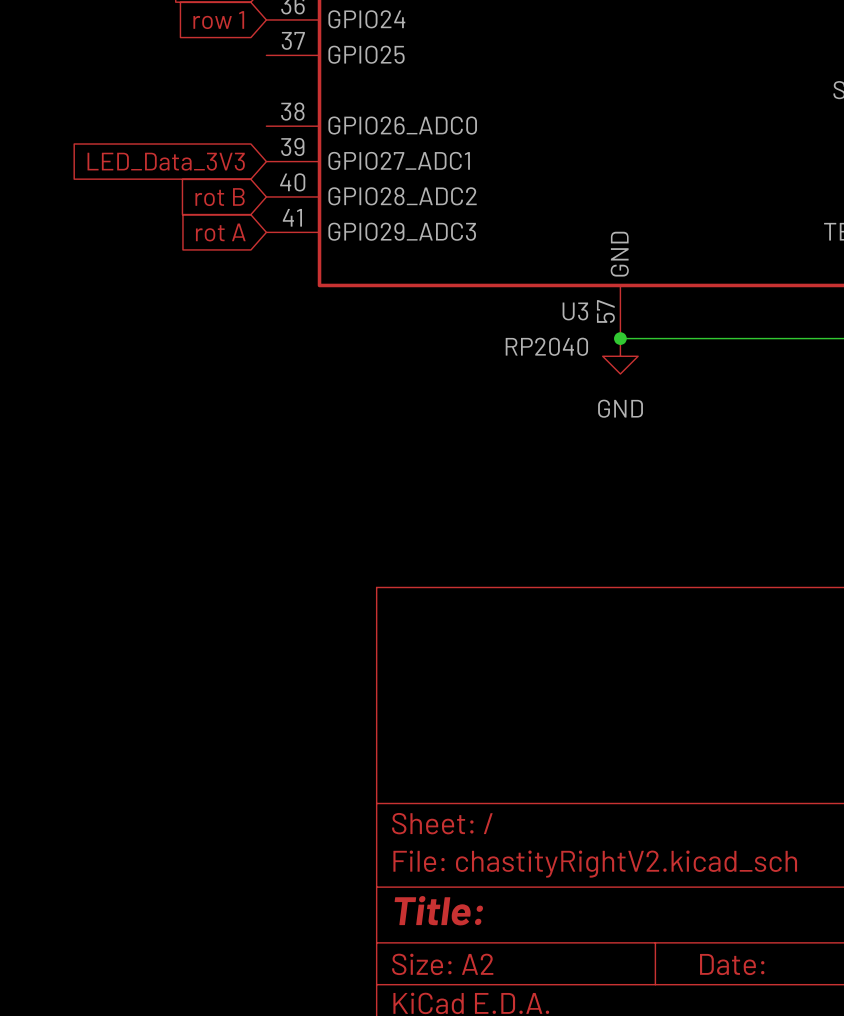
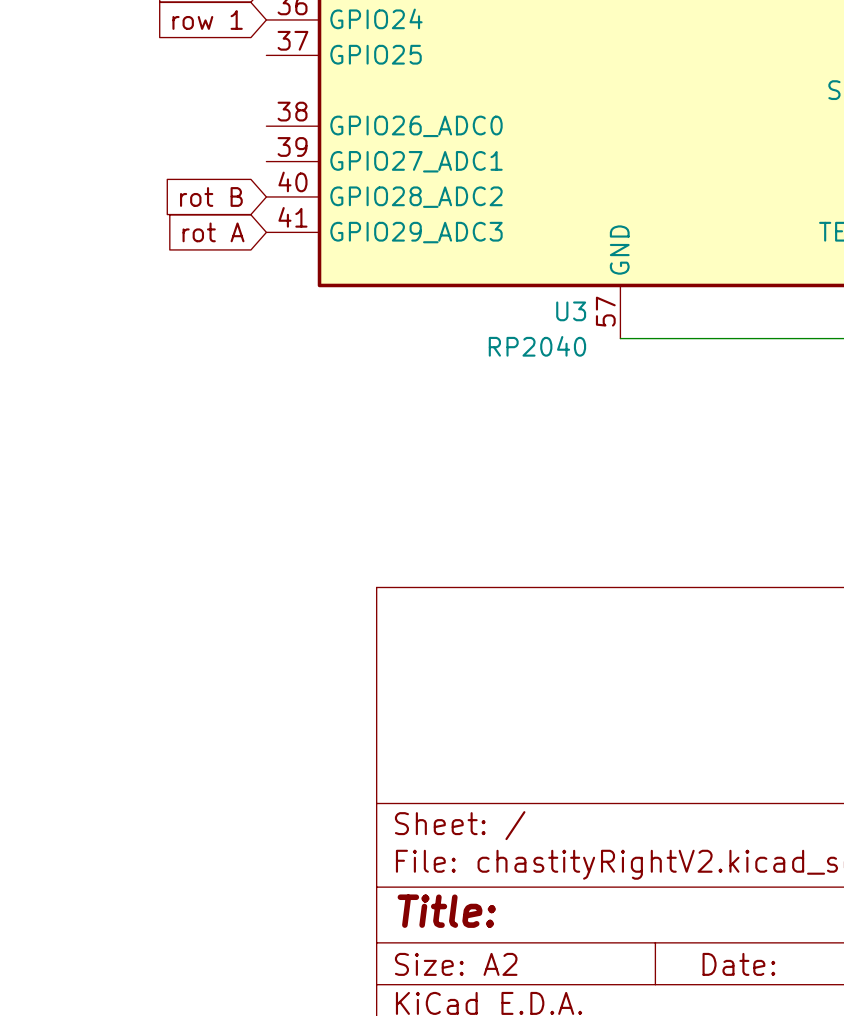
global label: LED_Data_3V3 (166, 161) -> none
junction: (620, 338) -> none
power symbol: GND (620, 356) -> none

